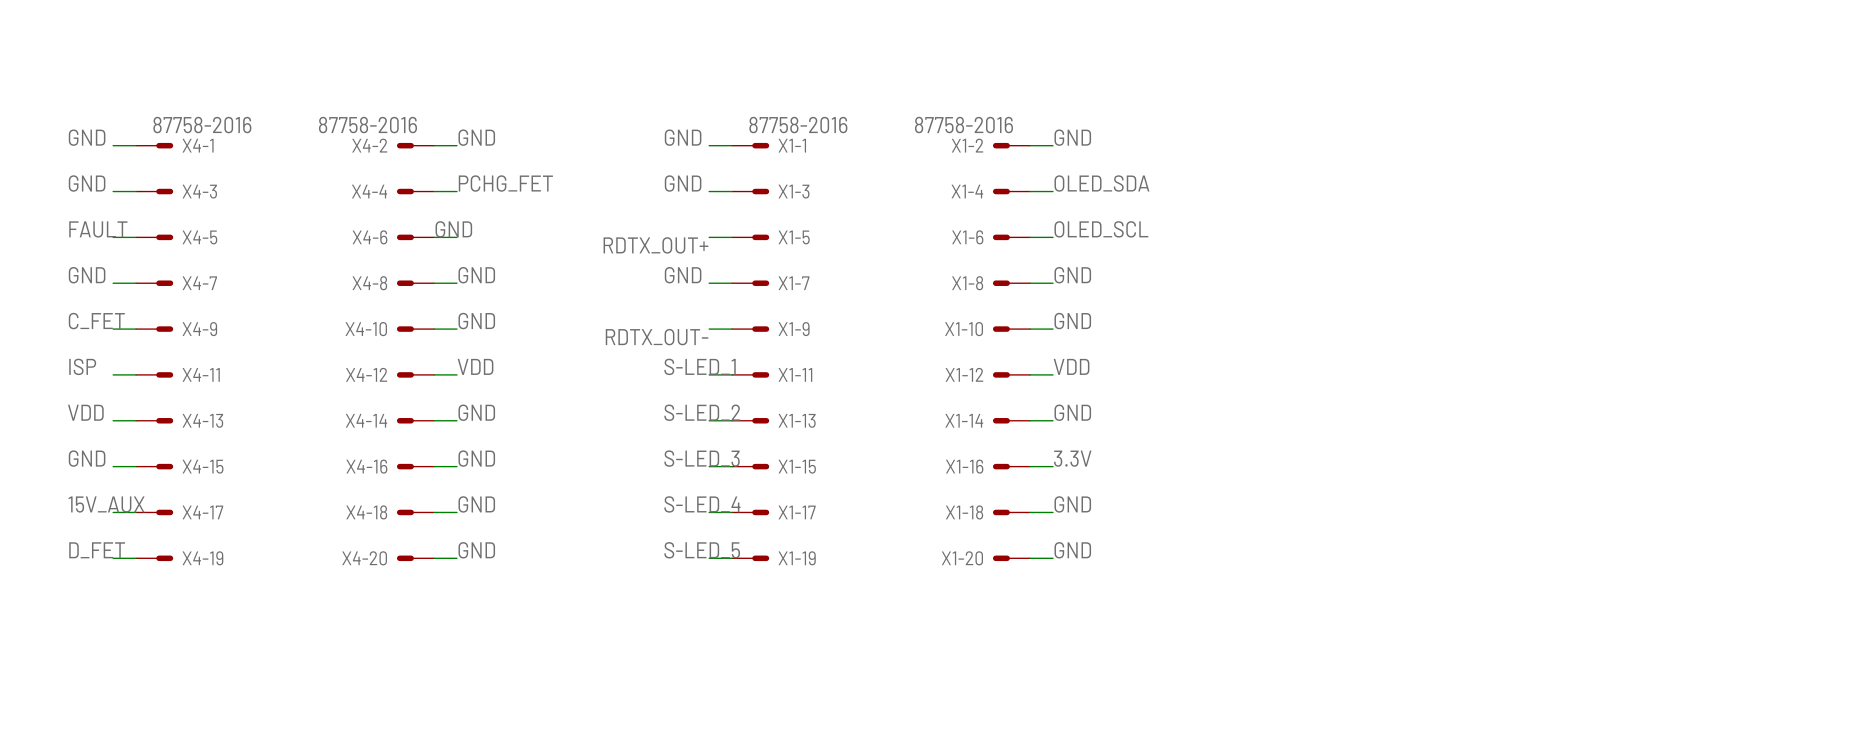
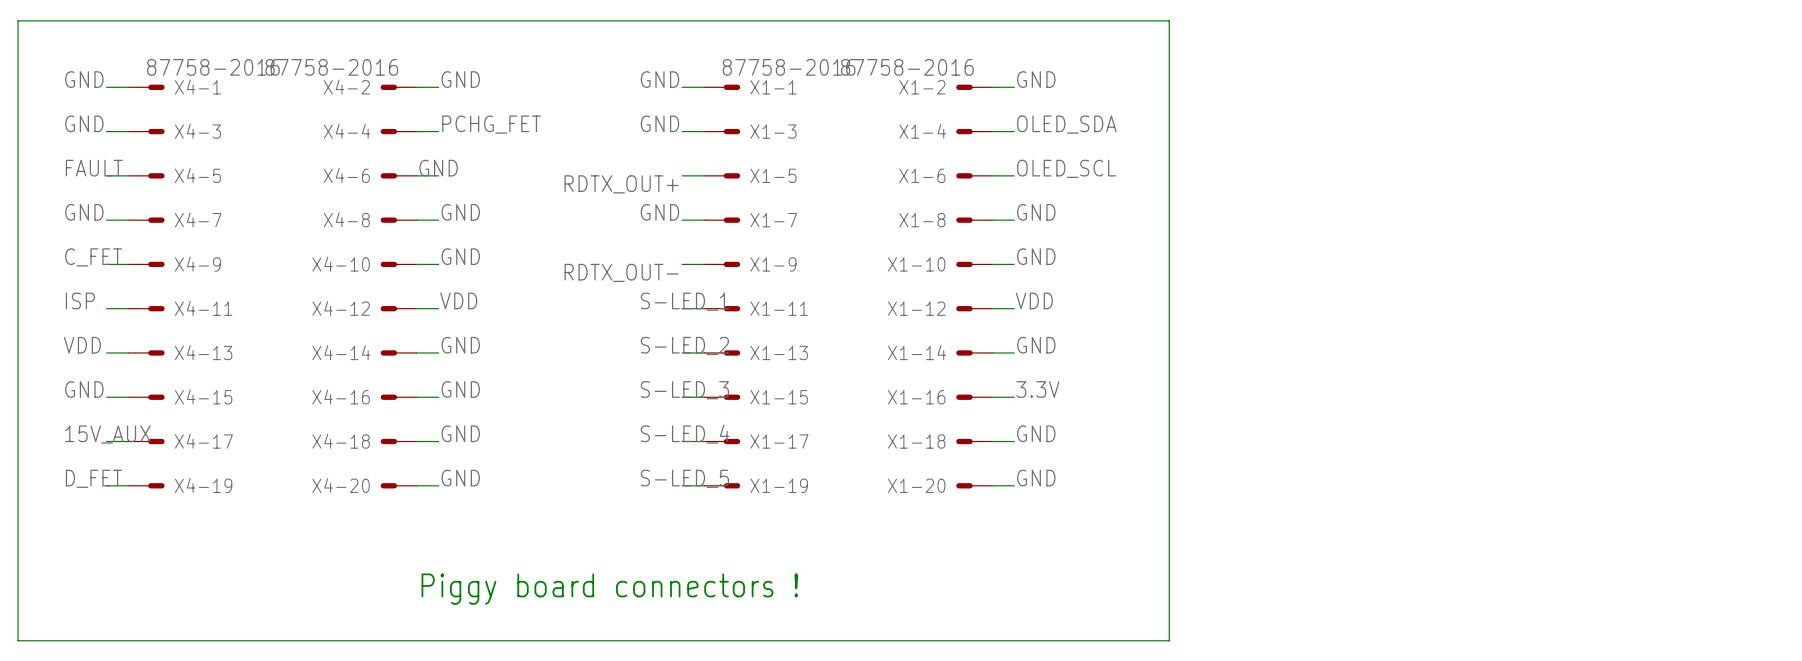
wire: none -> (18, 20) (18, 640) (1169, 640) (1169, 20) (18, 20)
text: none -> Piggy board connectors ! (609, 589)

